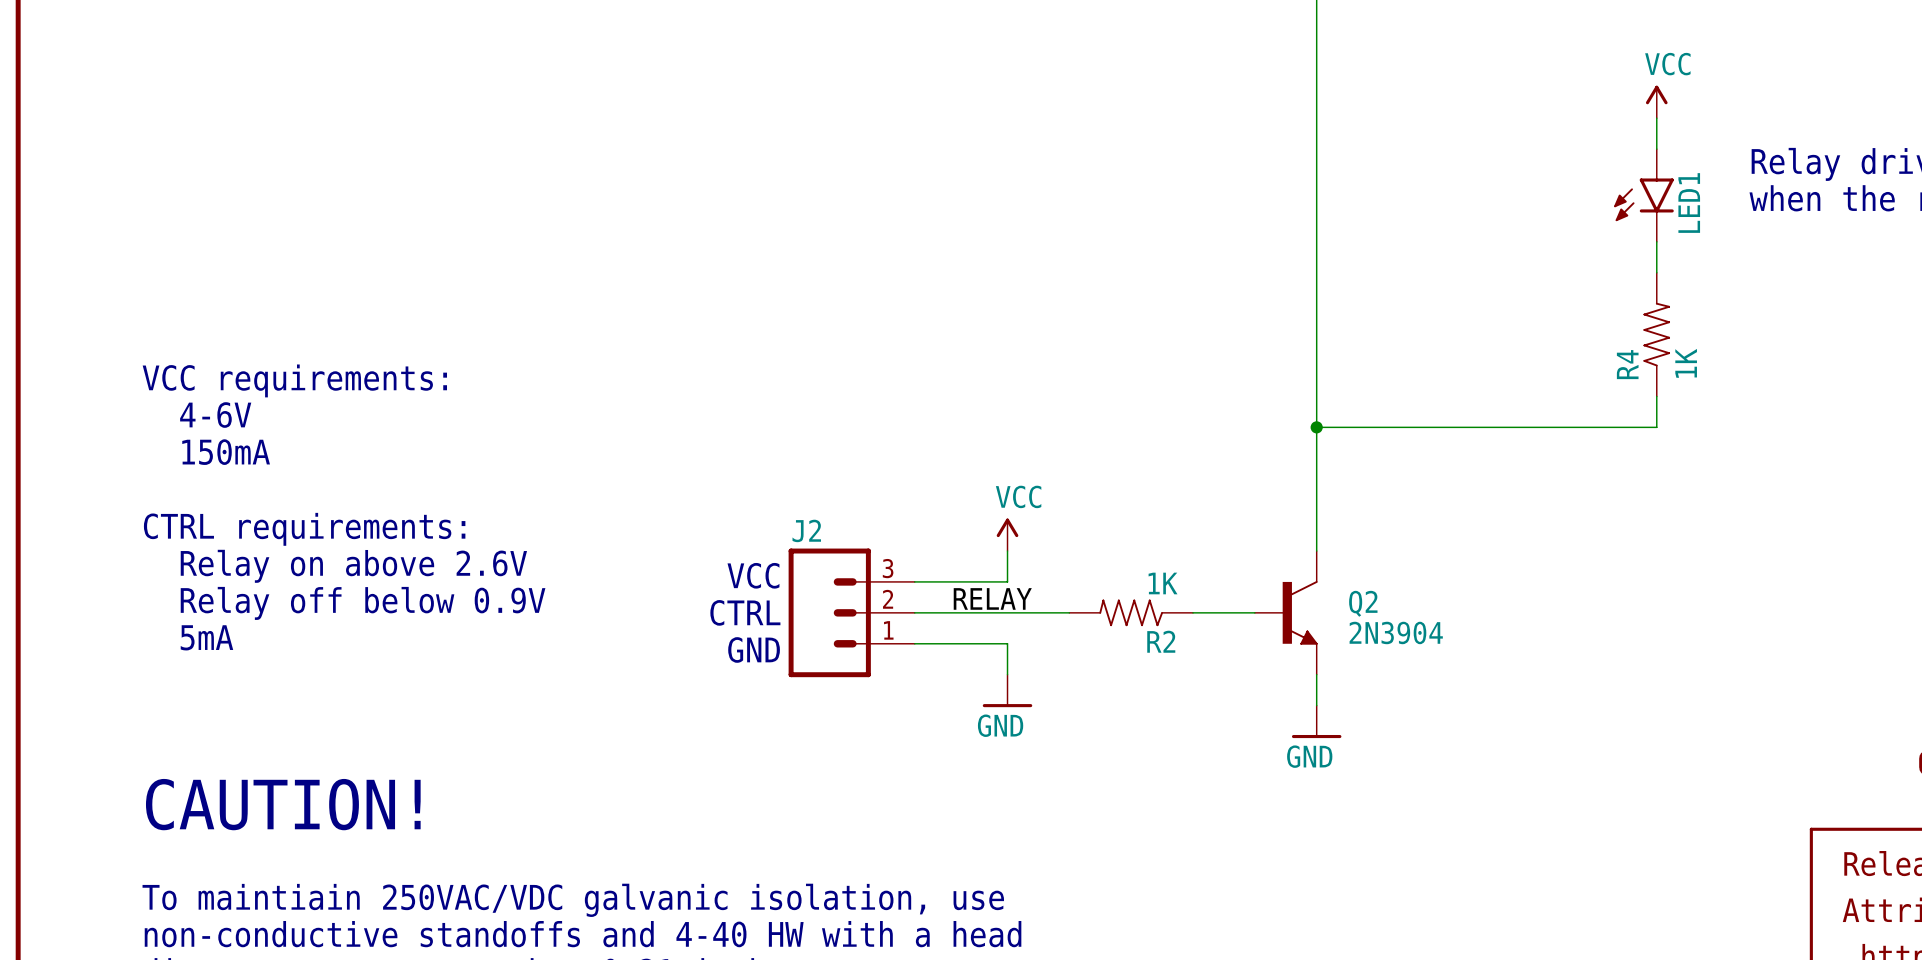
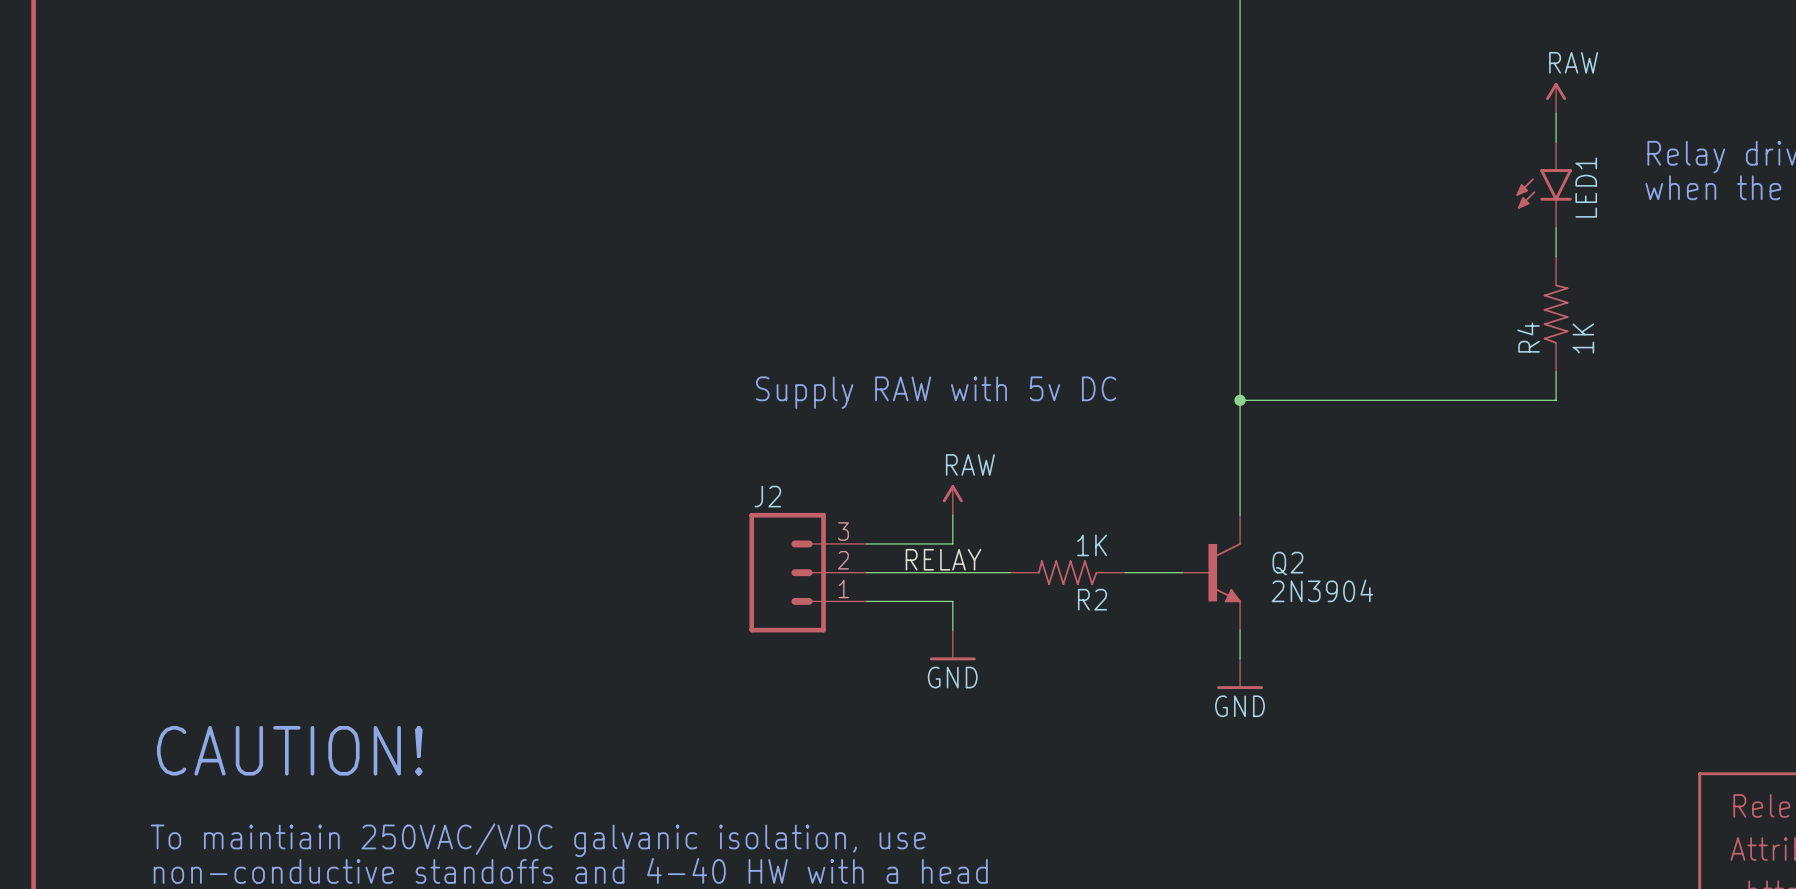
power symbol: VCC (1656, 101) -> RAW (1556, 97)
text: VCC requirements: (294, 380) -> none
text: 4-6V (215, 415) -> none
text: none -> Supply RAW with 5v DC (936, 392)
text: 150mA (226, 452) -> none
text: CTRL requirements: (304, 529) -> none
power symbol: VCC (1007, 534) -> RAW (952, 500)
text: Relay on above 2.6V (353, 566) -> none
text: VCC (753, 575) -> none
text: Relay off below 0.9V (363, 603) -> none
text: CTRL (745, 612) -> none
text: 5mA (206, 637) -> none
text: GND (754, 649) -> none

